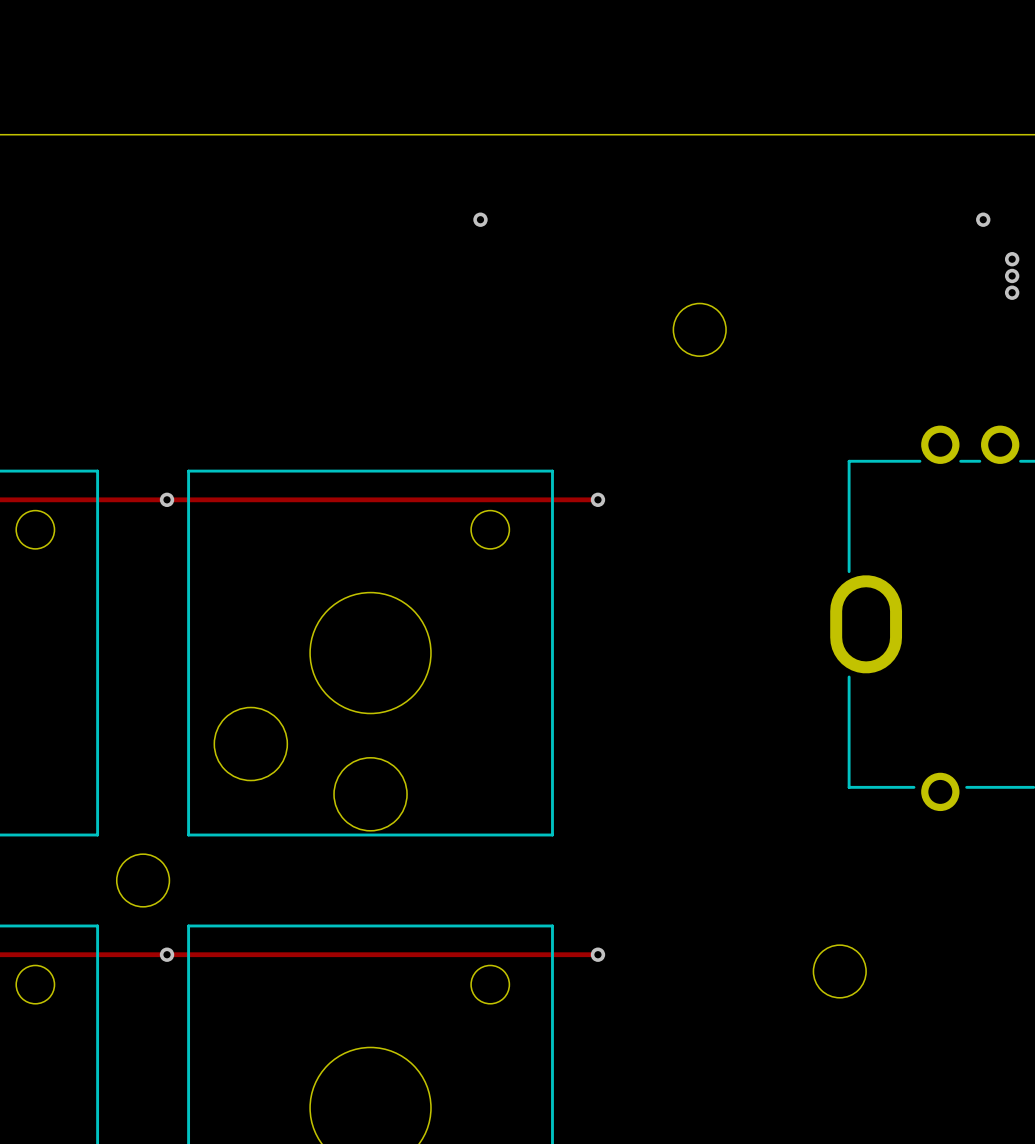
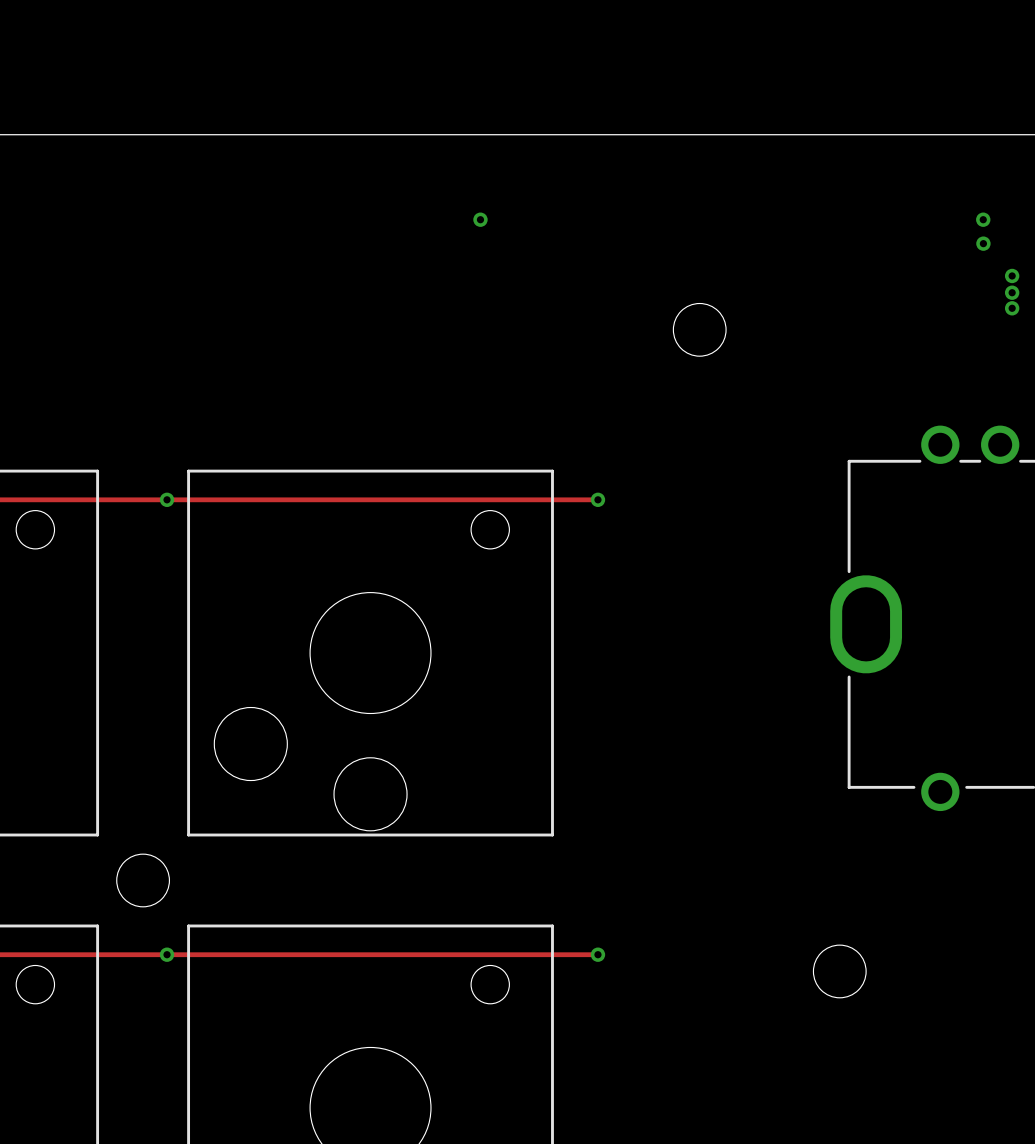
via: none -> (983, 243)
via: (1012, 259) -> none
via: none -> (1012, 308)

